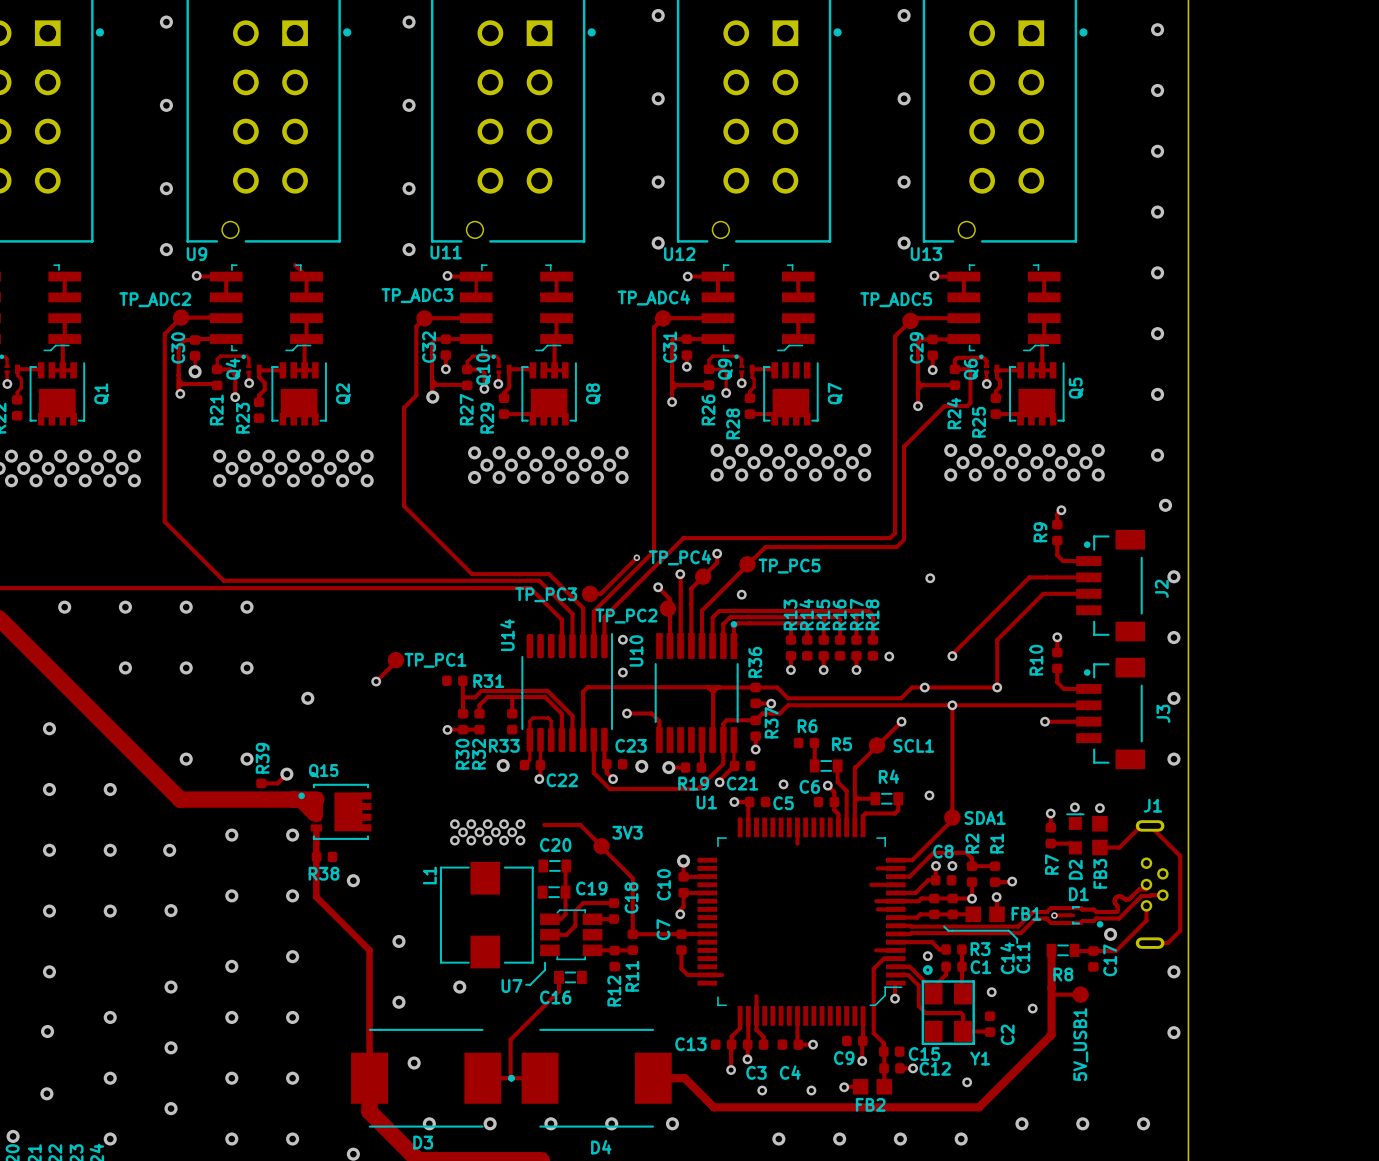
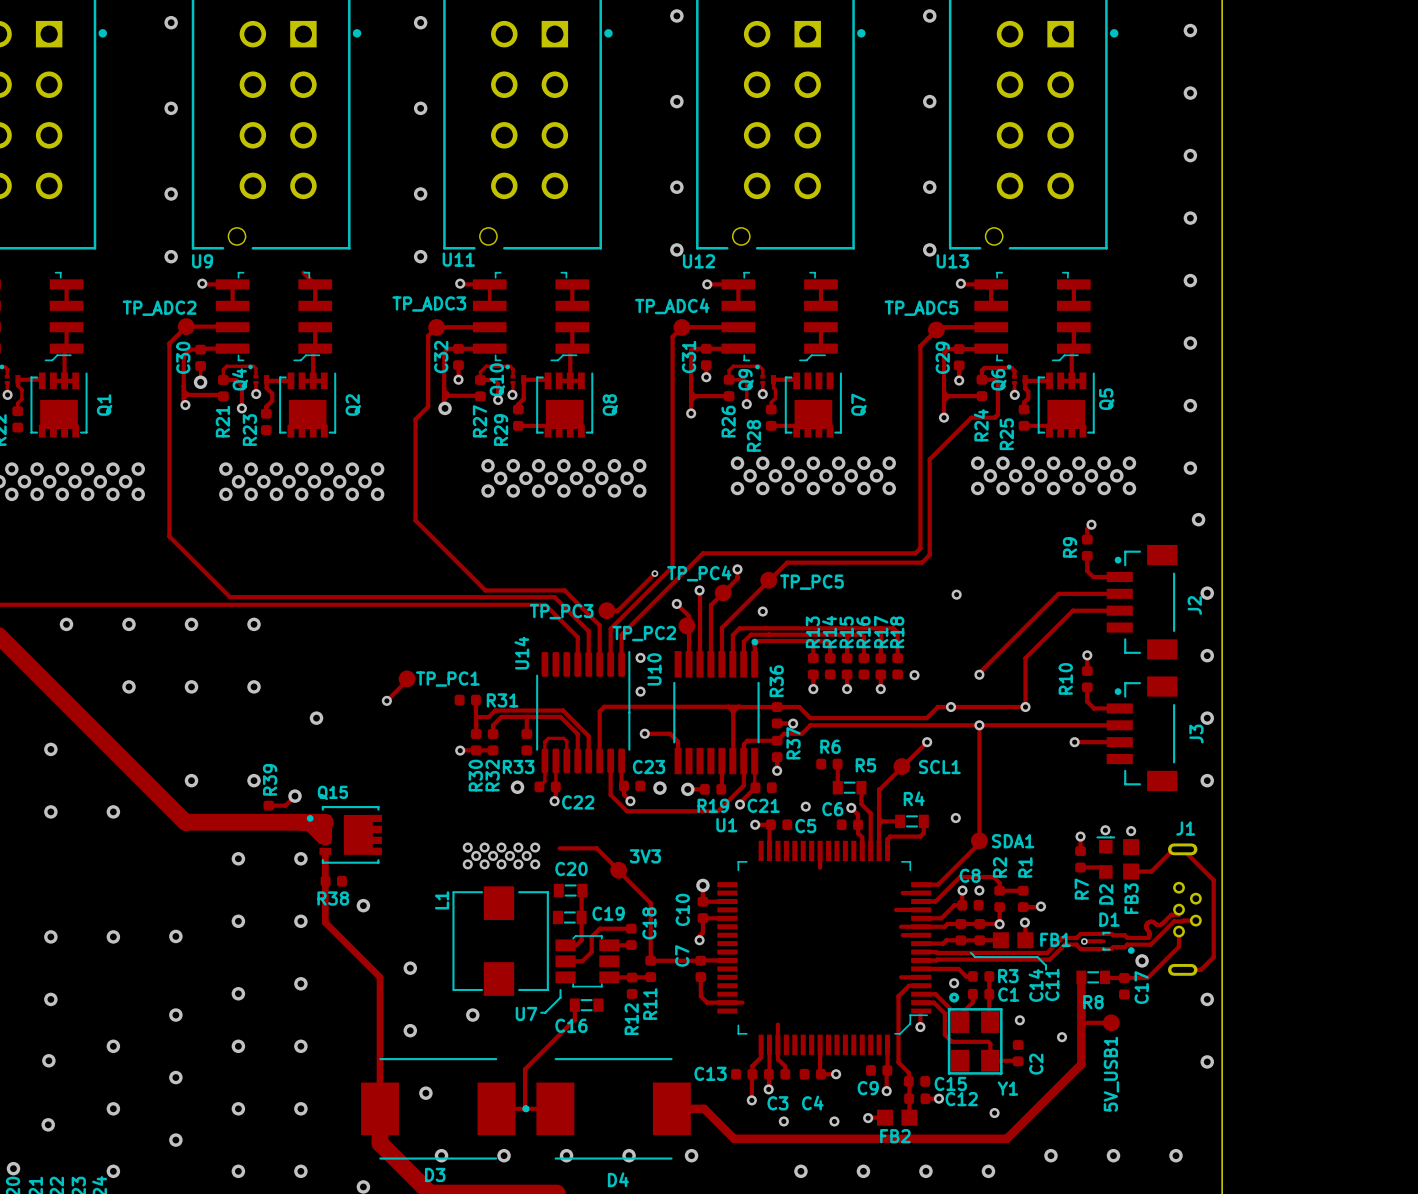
via: (49, 850) -> none
via: (110, 850) -> none
via: (169, 850) -> none

